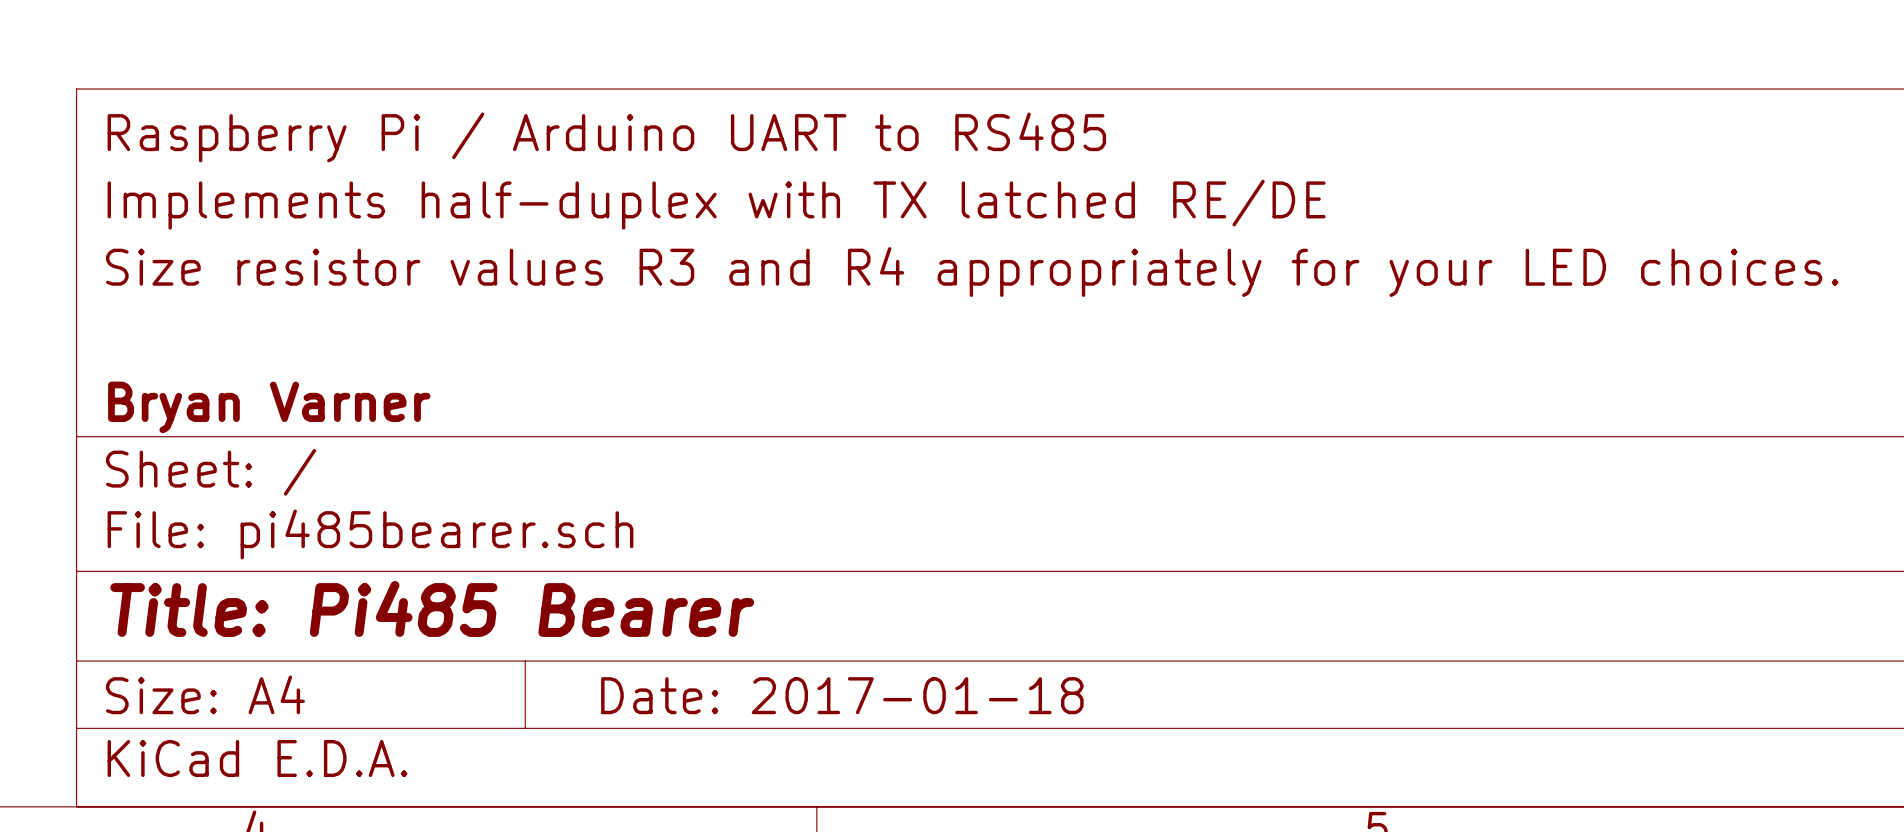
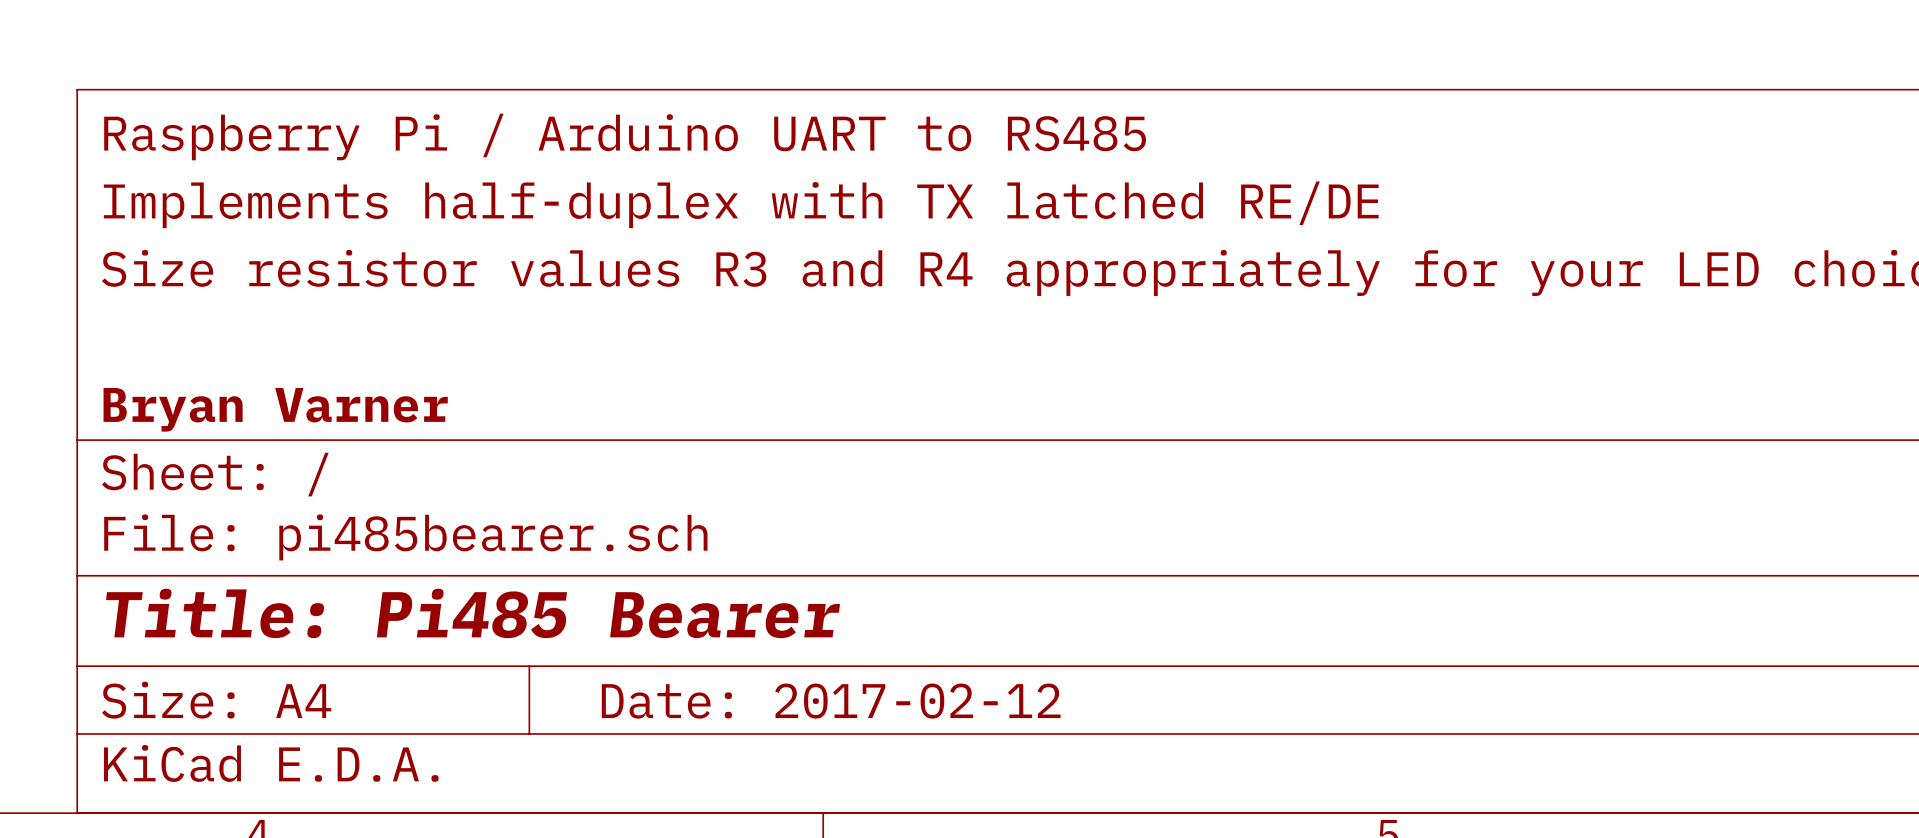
title block: Date: 2017-01-18 (842, 695) -> Date: 2017-02-12 (831, 701)

